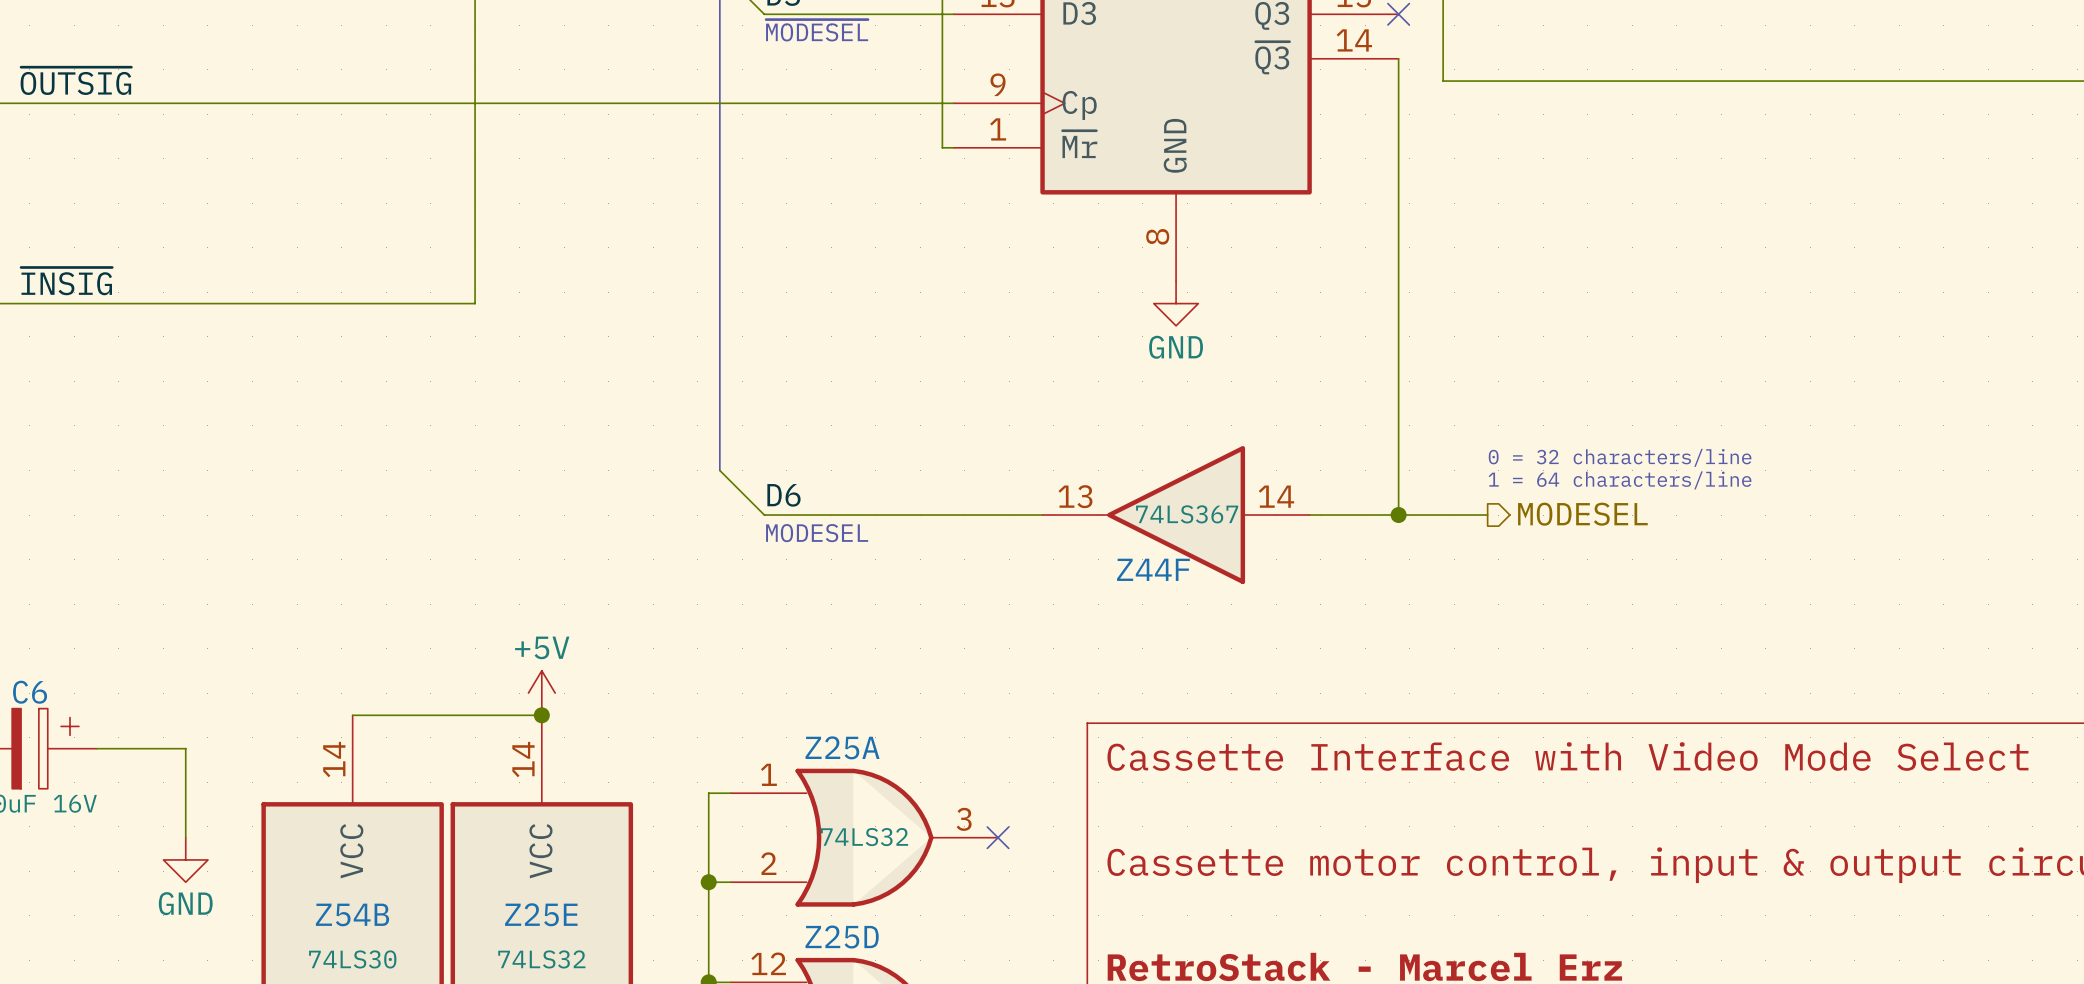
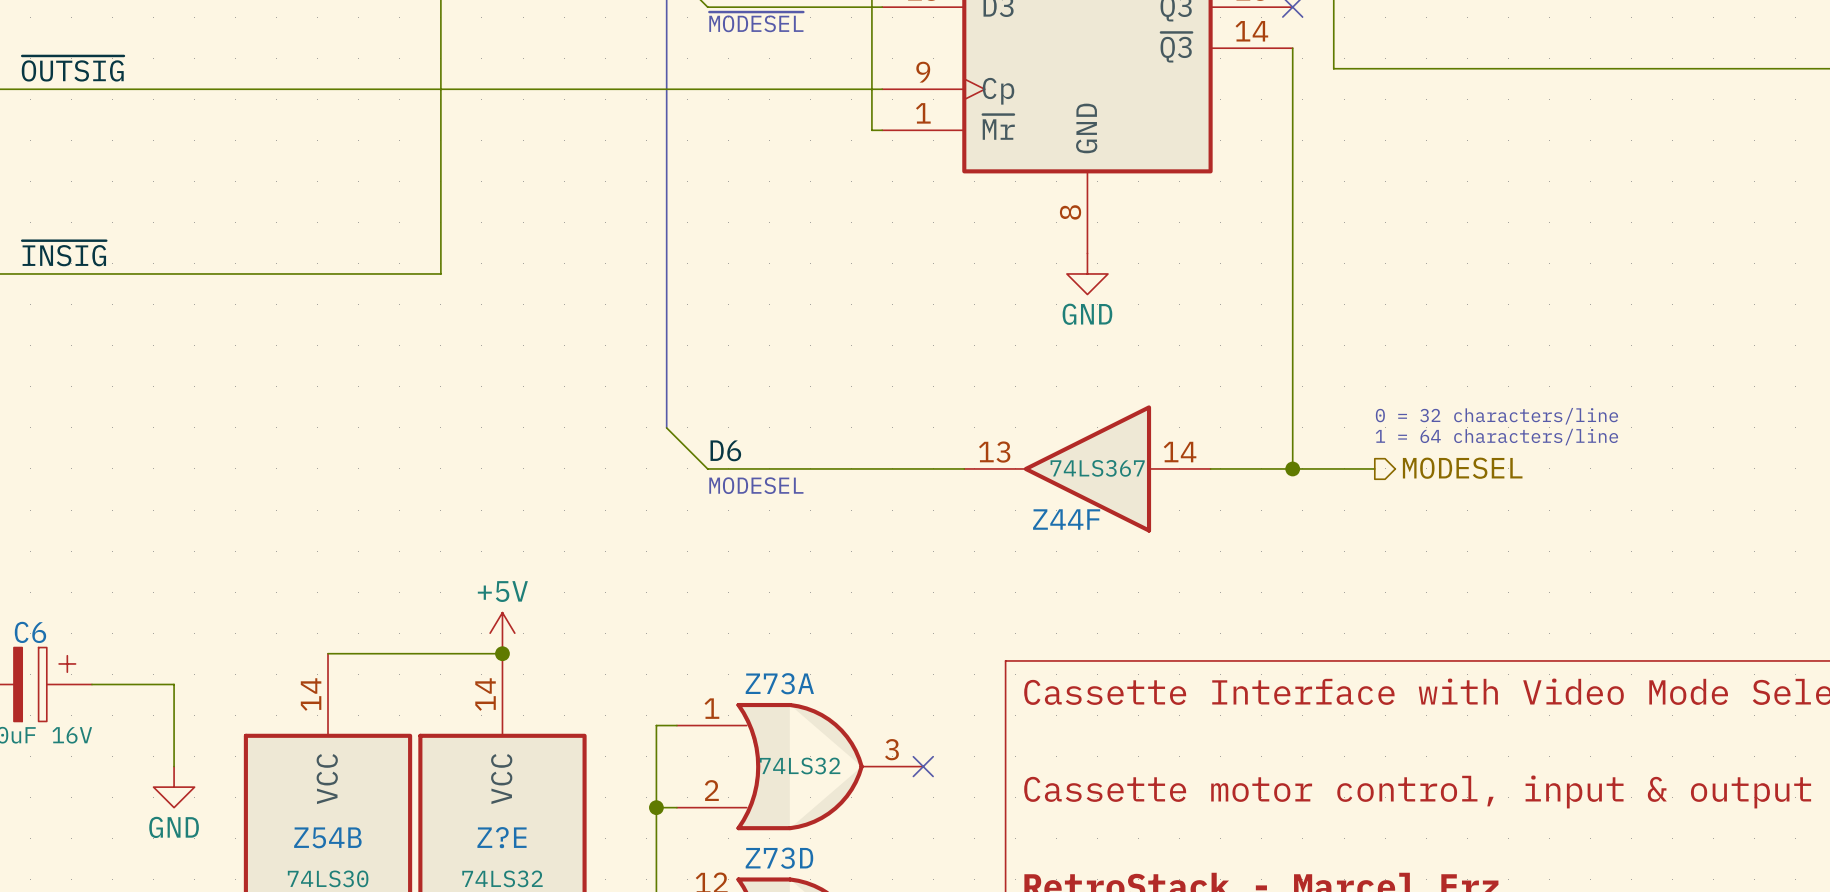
Z25A name: Z25A (842, 747) -> Z73A (779, 683)
Z25E name: Z25E (541, 914) -> Z?E (502, 837)
Z25D name: Z25D (842, 937) -> Z73D (779, 858)

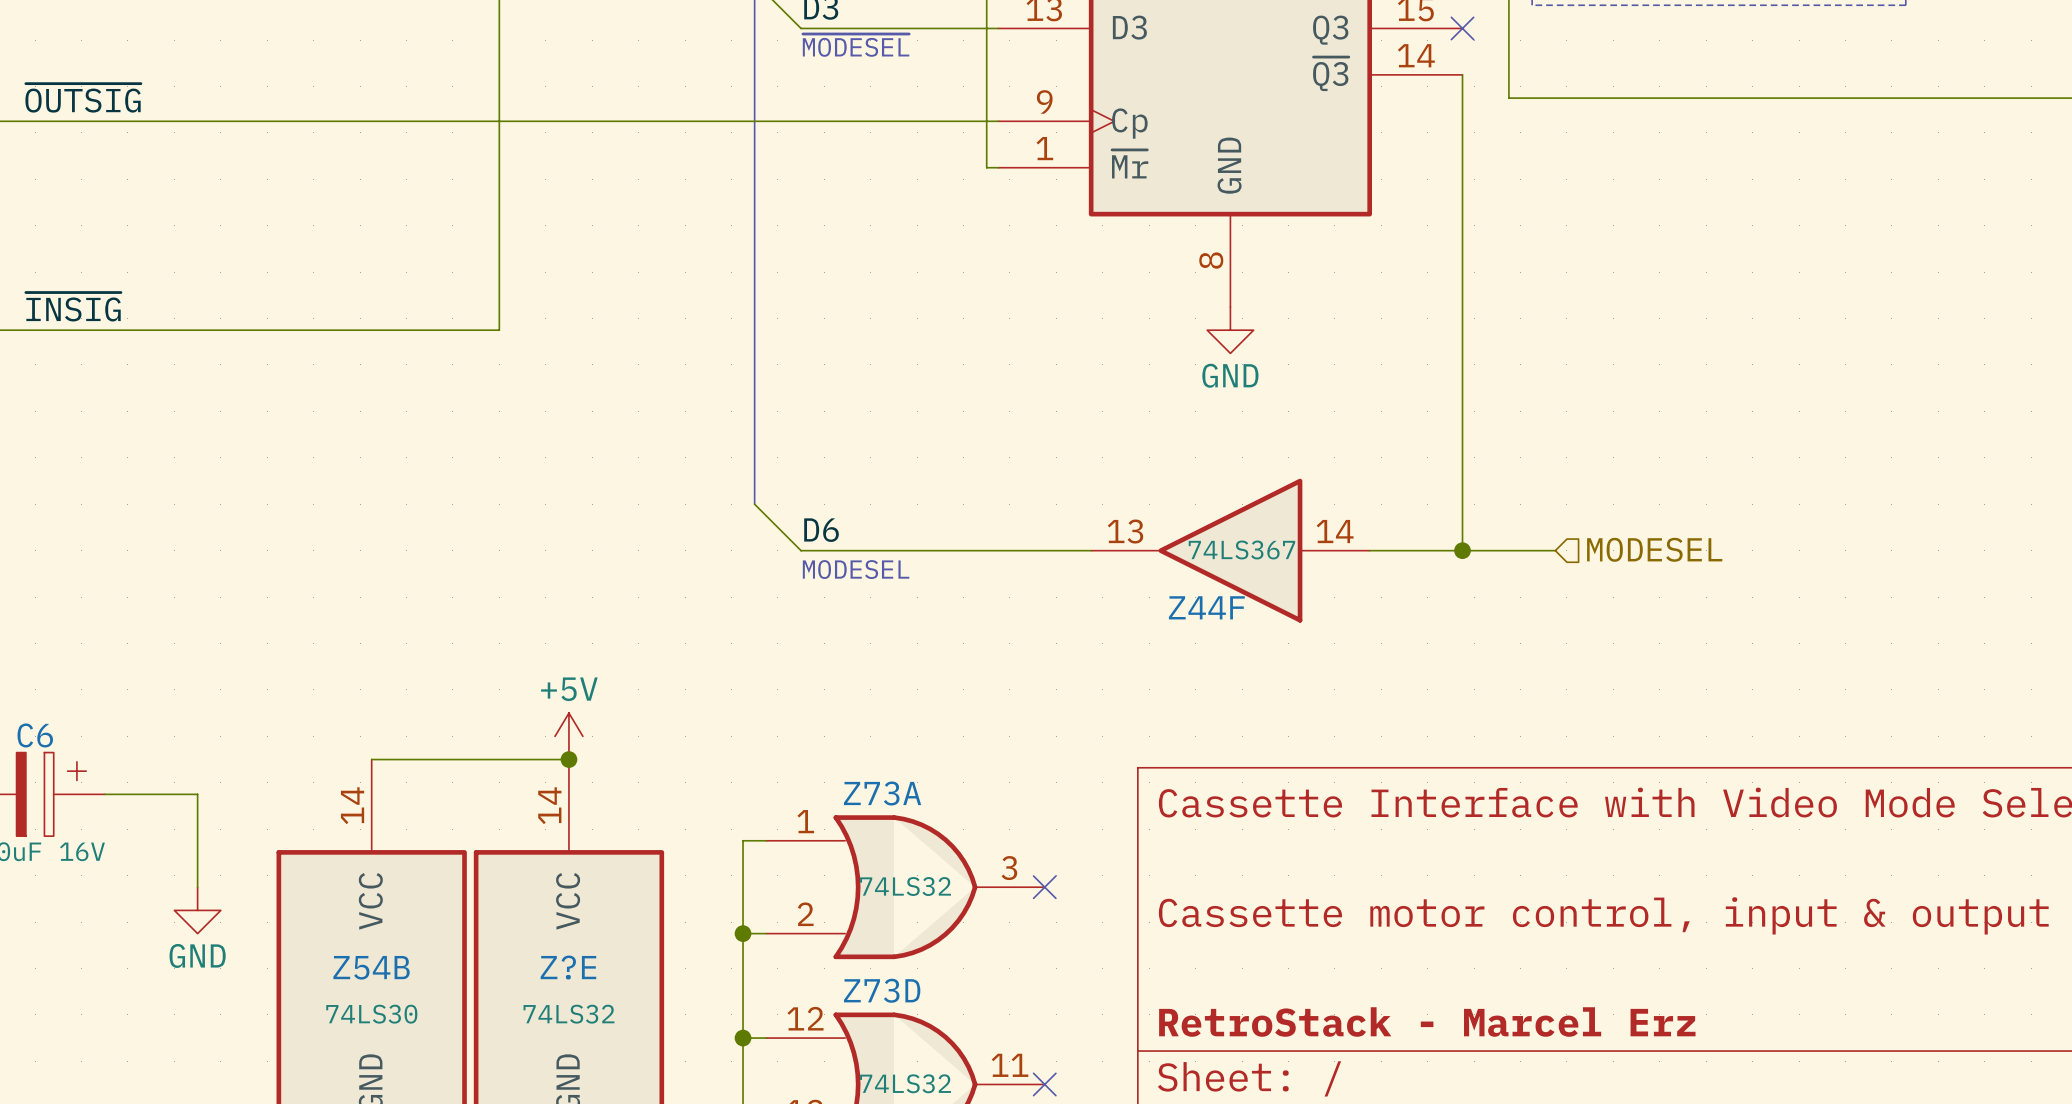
text: 0 = 32 characters/line (1496, 416) -> none
text: 1 = 64 characters/line (1496, 437) -> none
hierarchical label shape: output (1462, 468) -> input (1654, 549)

